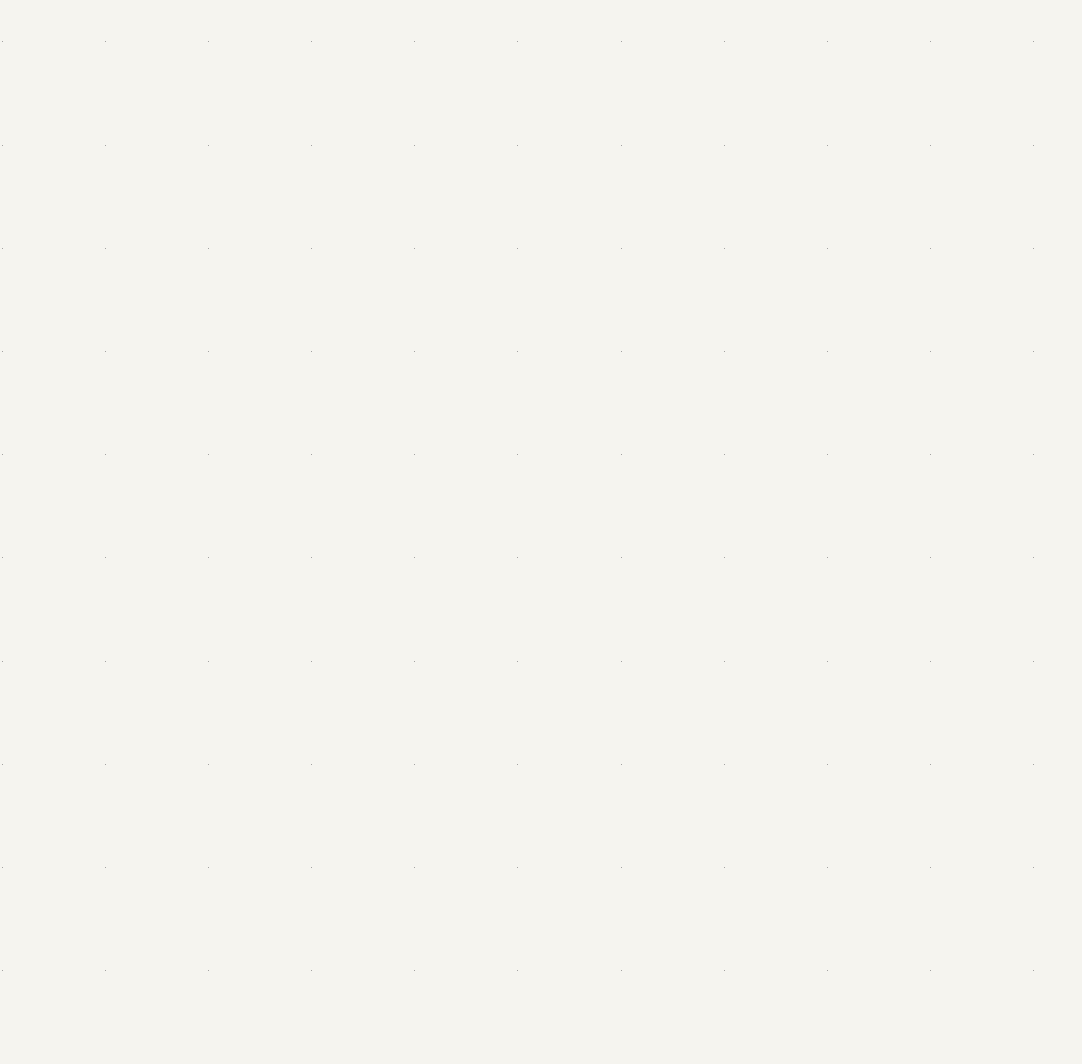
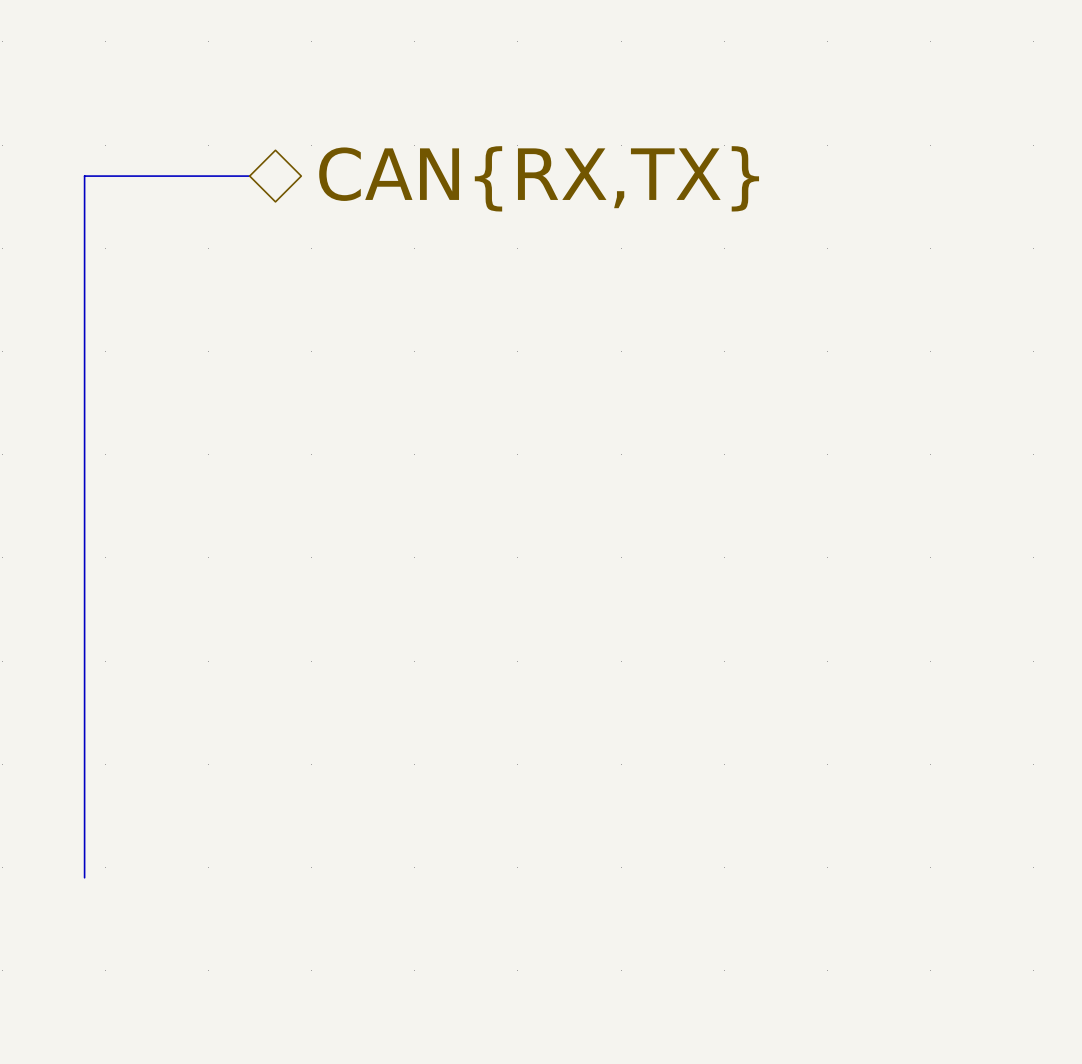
bus: none -> (249, 176) (84, 176) (84, 877)
hierarchical label: none -> CAN{RX,TX} (539, 178)

